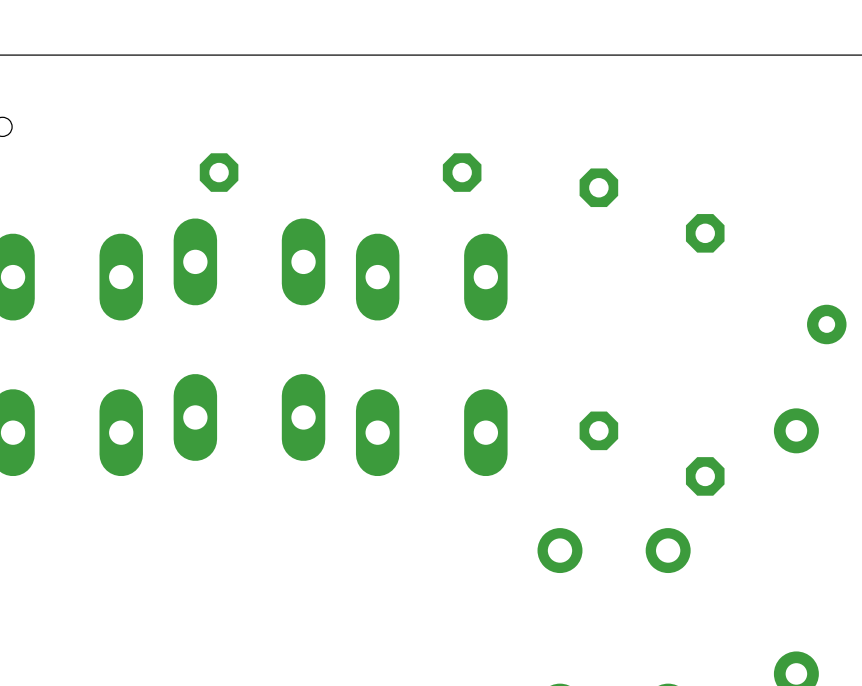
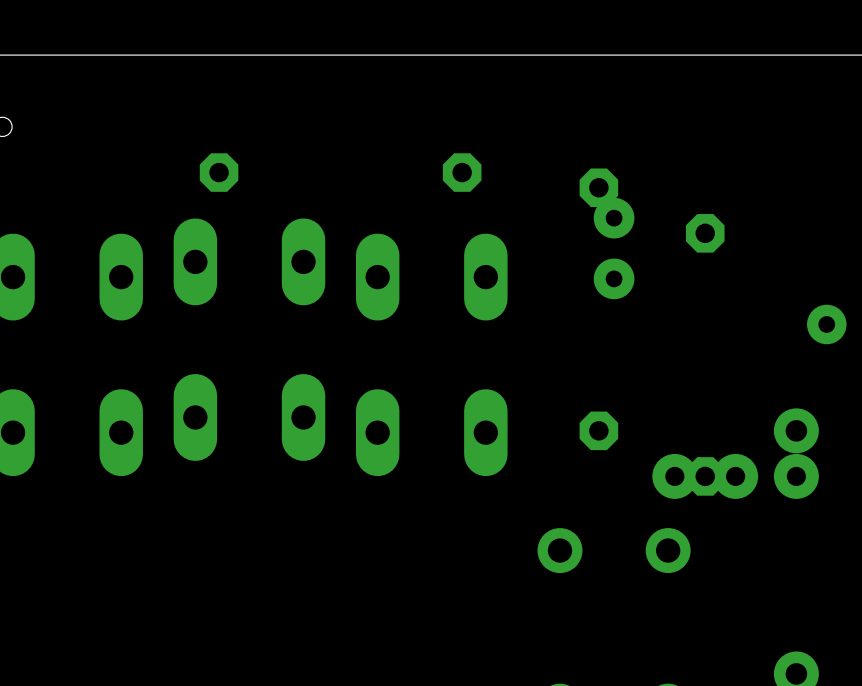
part: none -> (614, 248)
part: none -> (735, 476)

